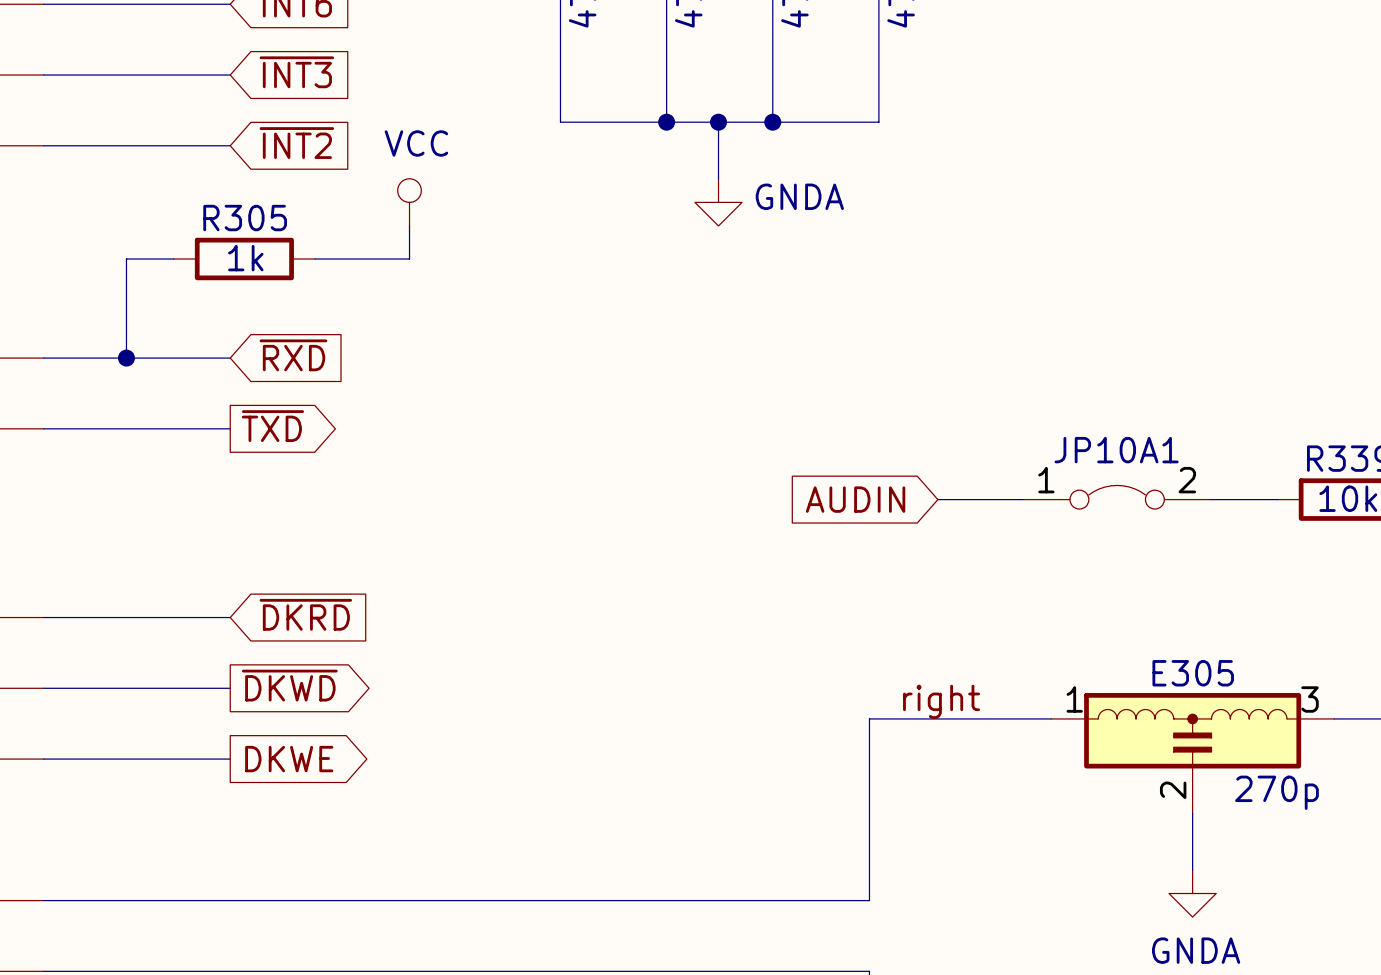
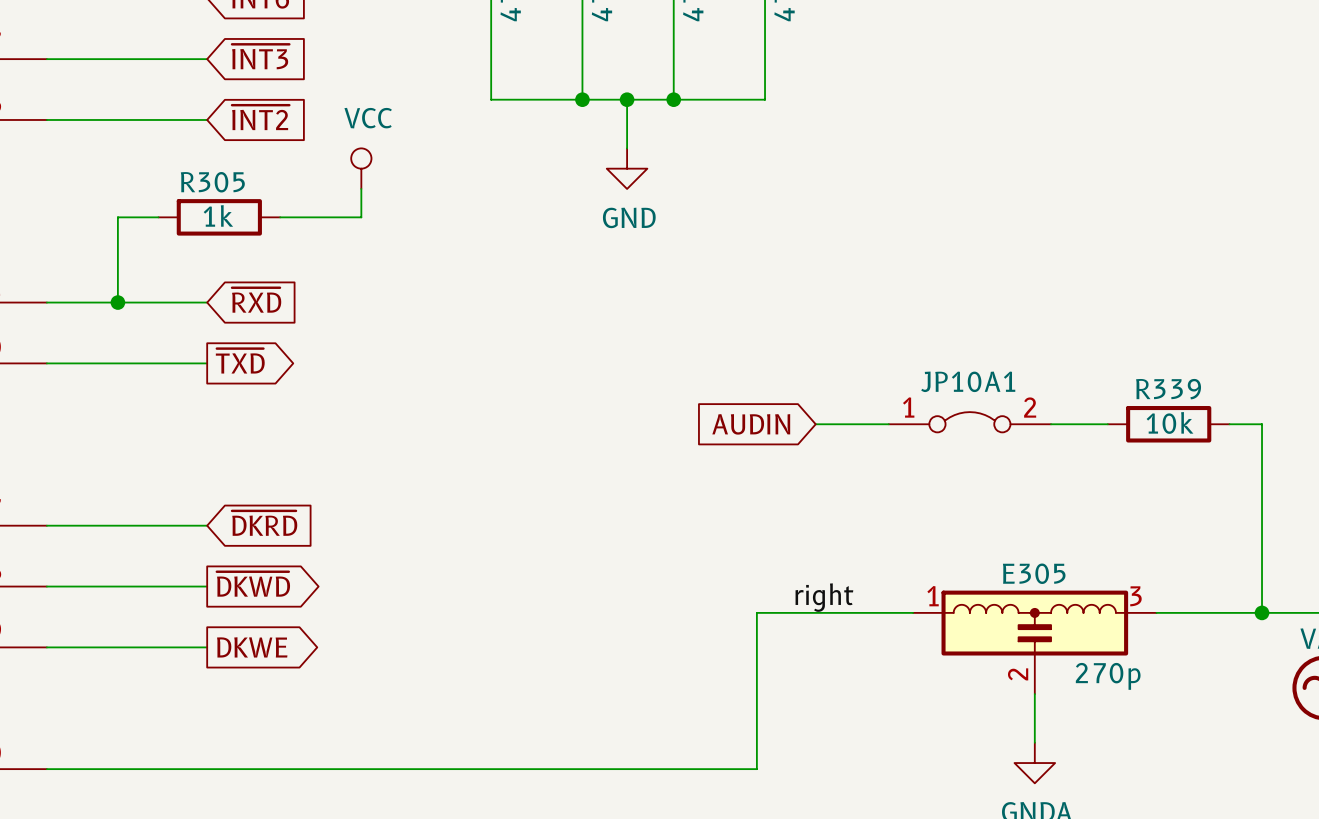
power symbol: GNDA (718, 202) -> GND (627, 168)

